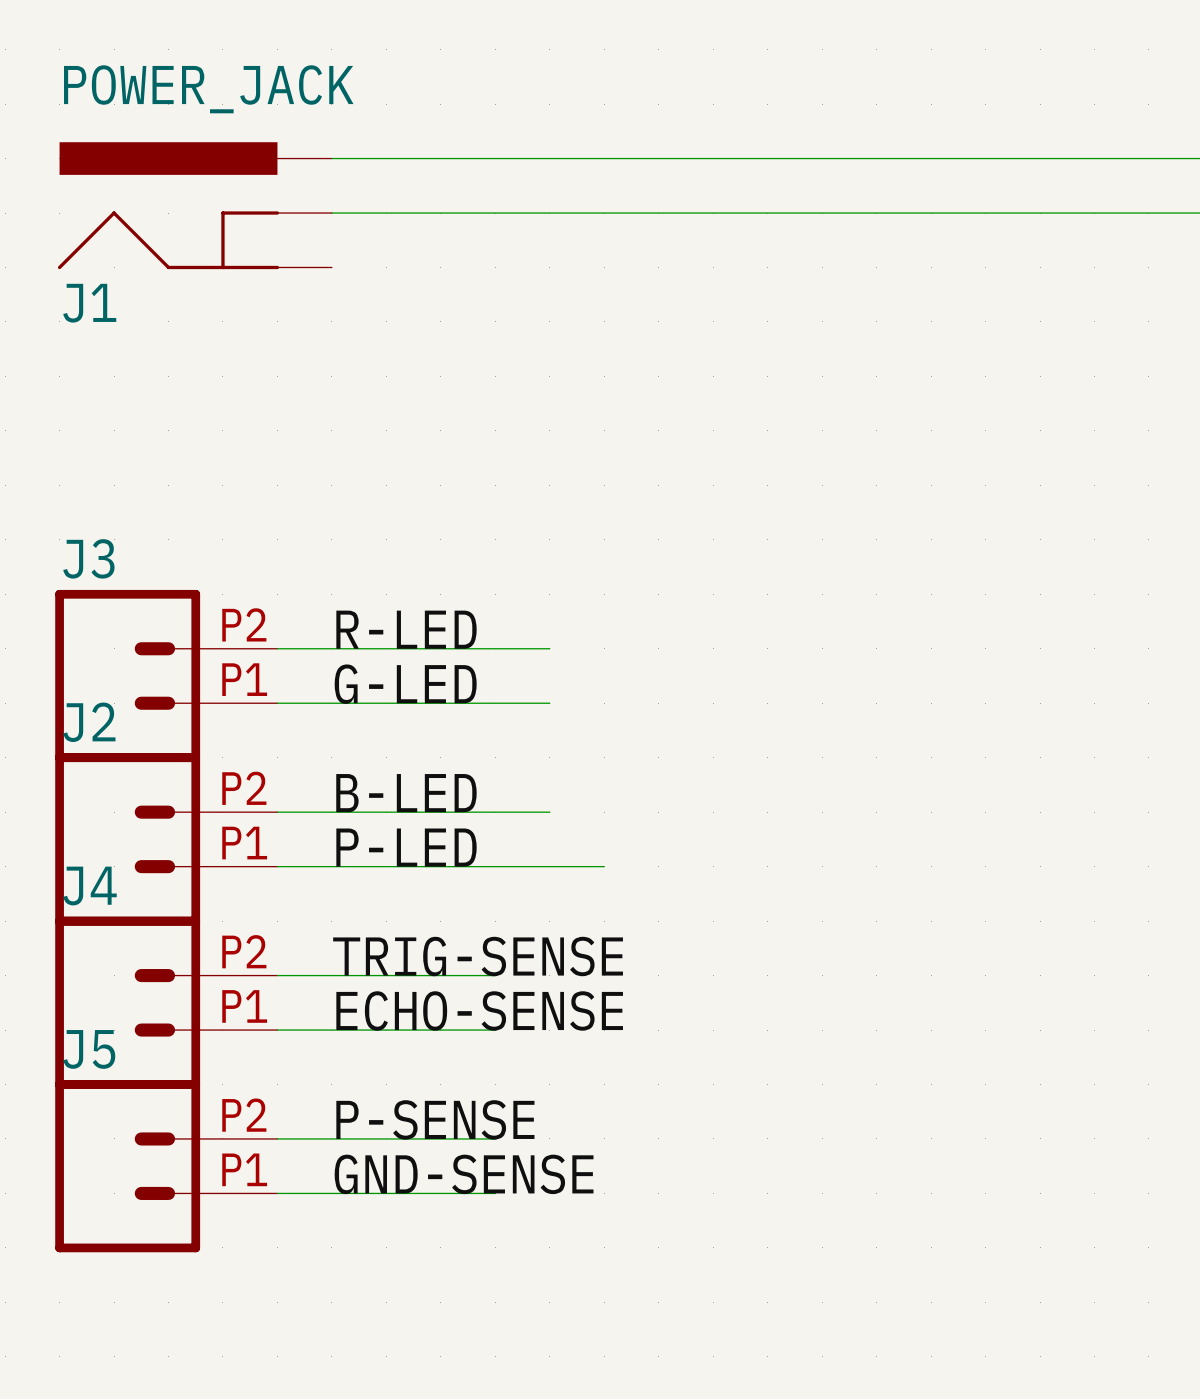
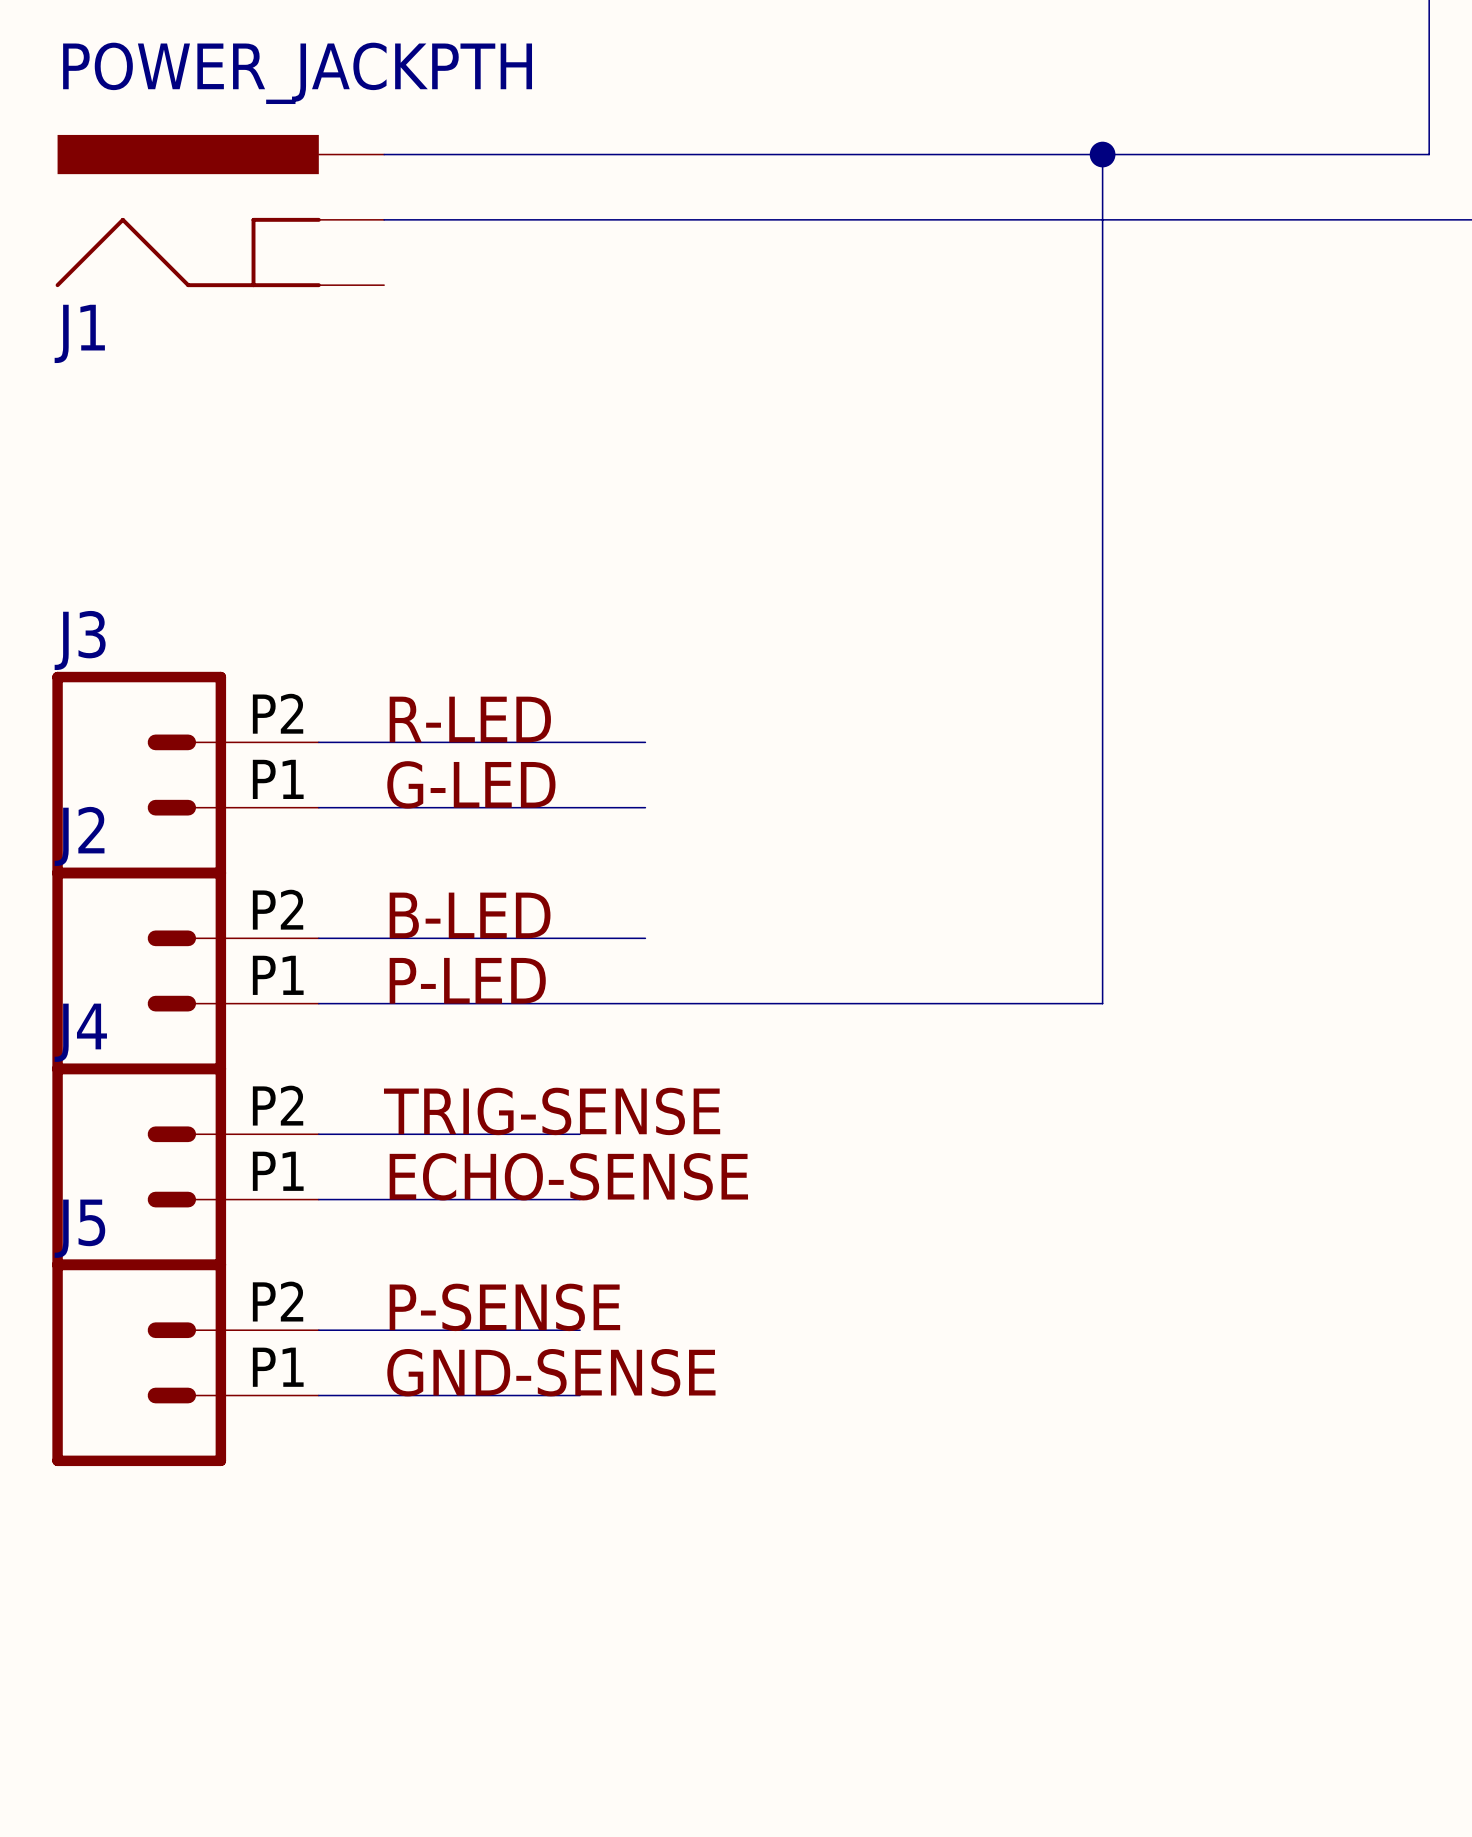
J1 value: POWER_JACK (208, 89) -> POWER_JACKPTH (297, 73)
wire: none -> (1102, 154) (1102, 1003) (710, 1003)
junction: none -> (1102, 154)

